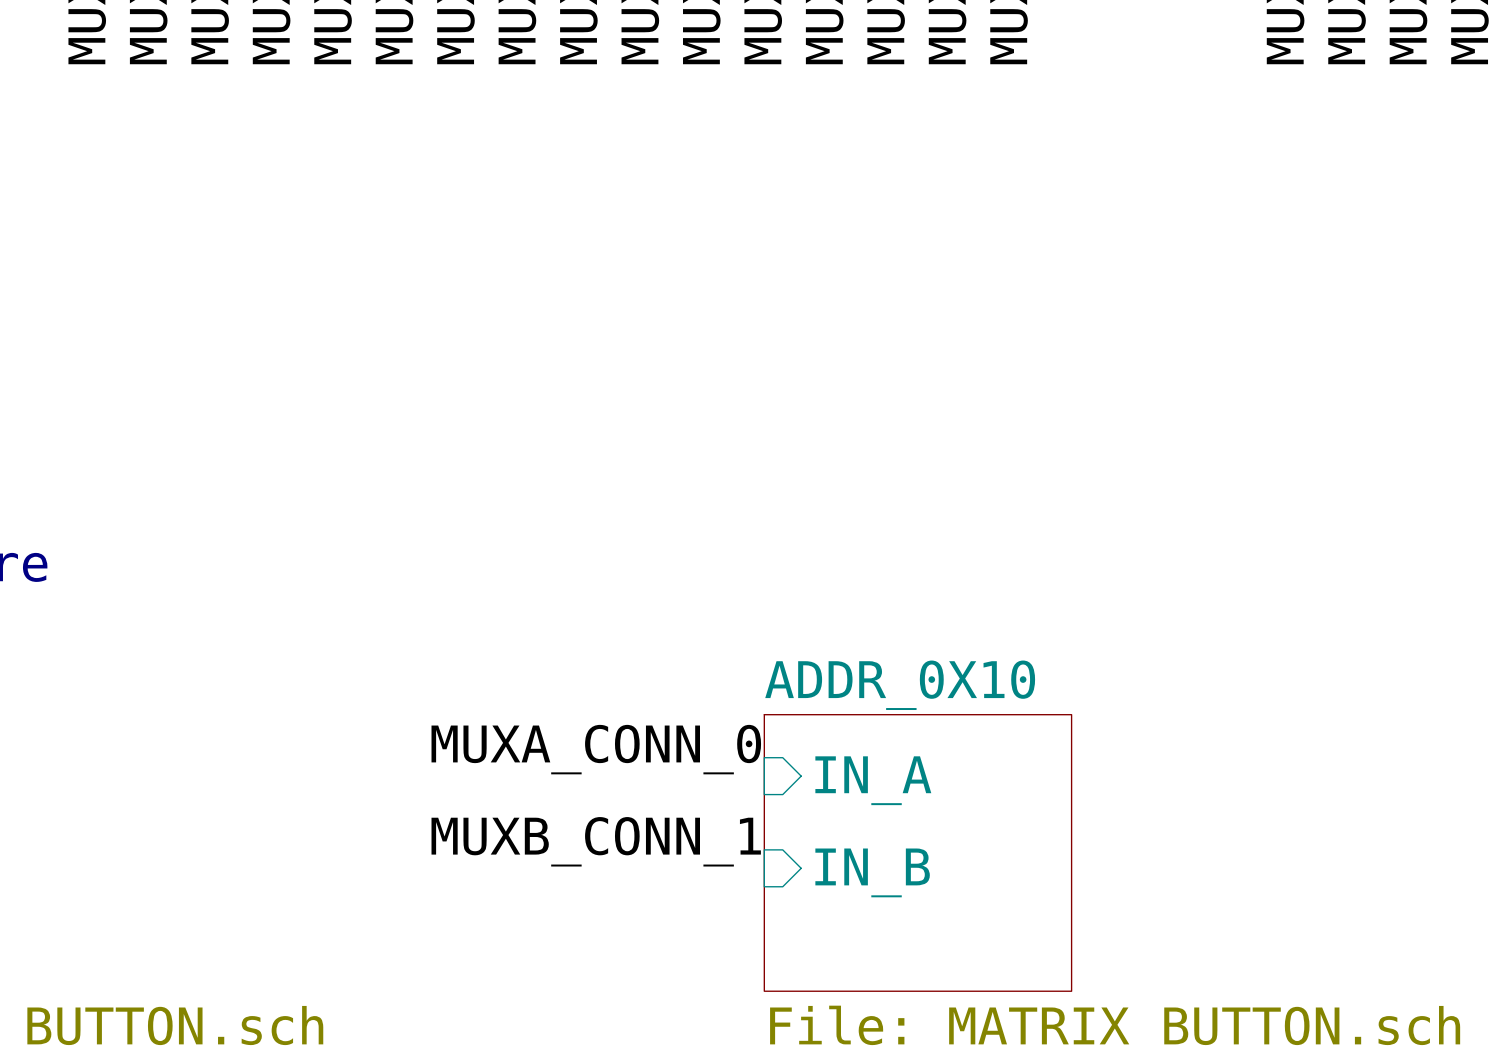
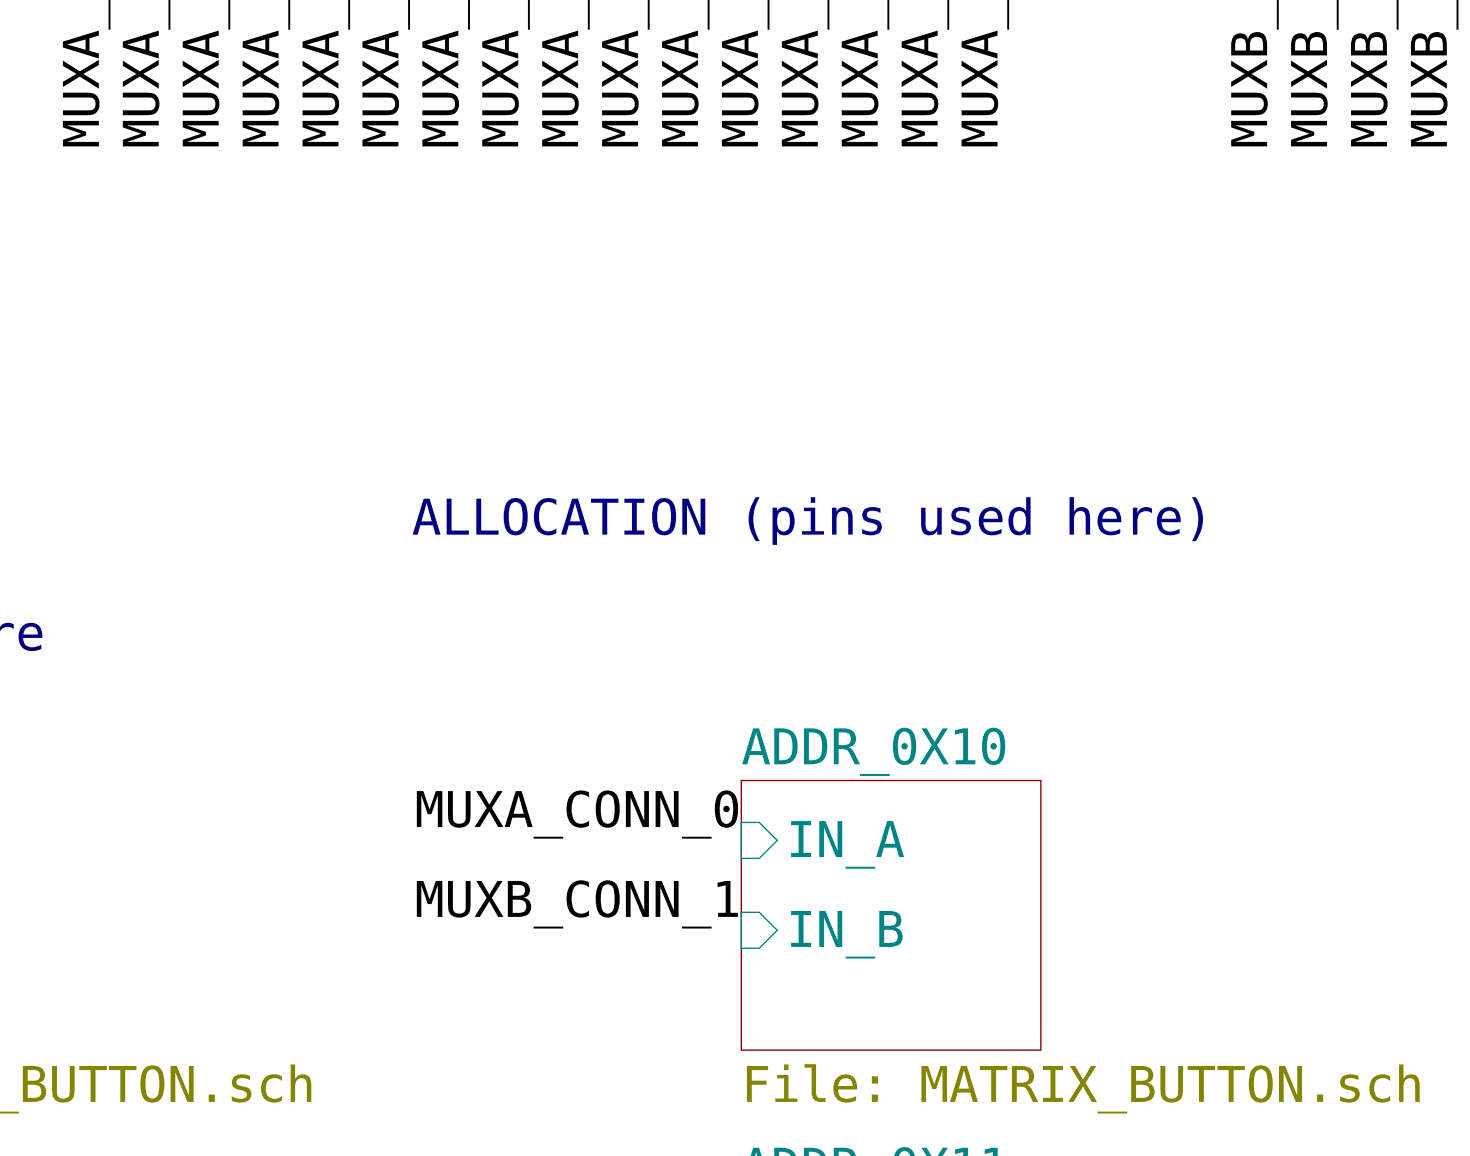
text: none -> ALLOCATION (pins used here) (807, 521)

